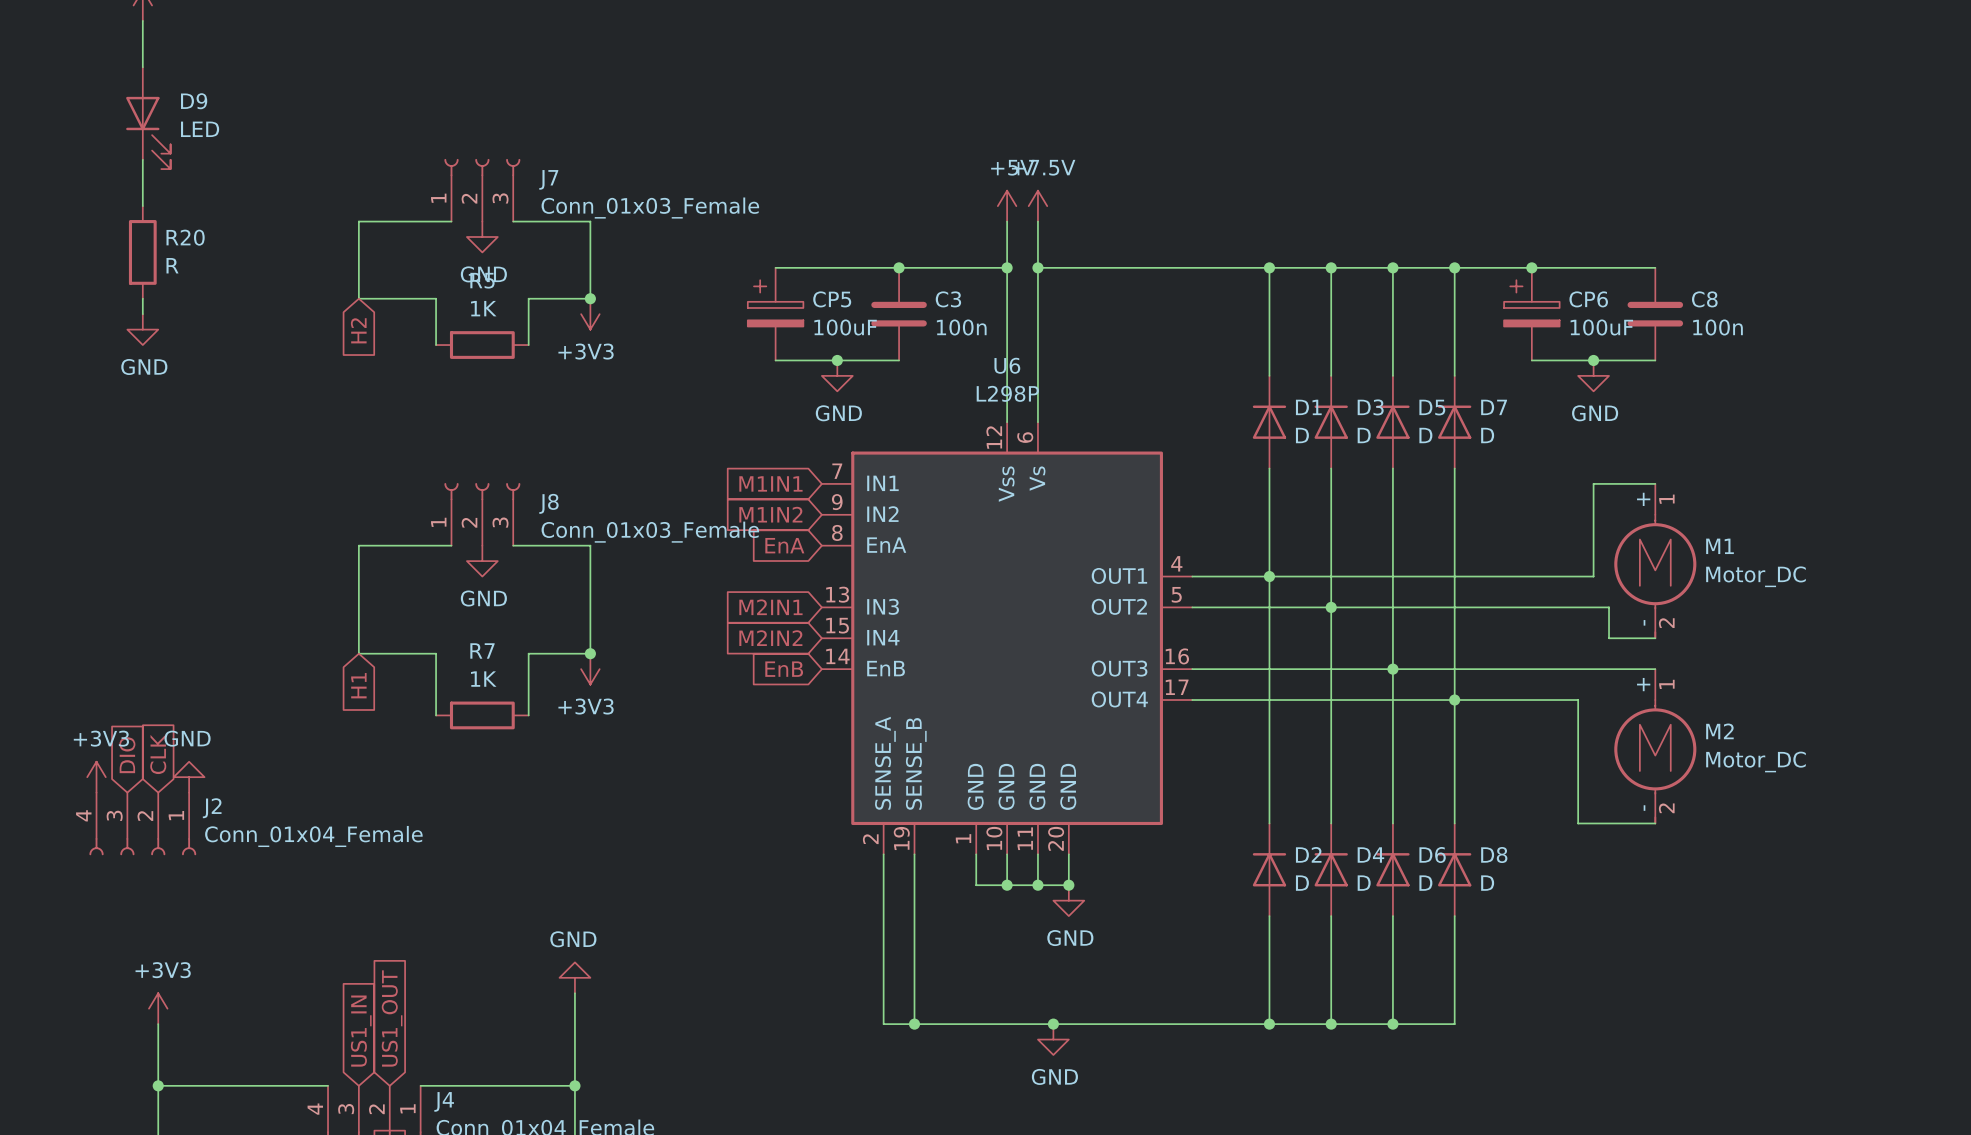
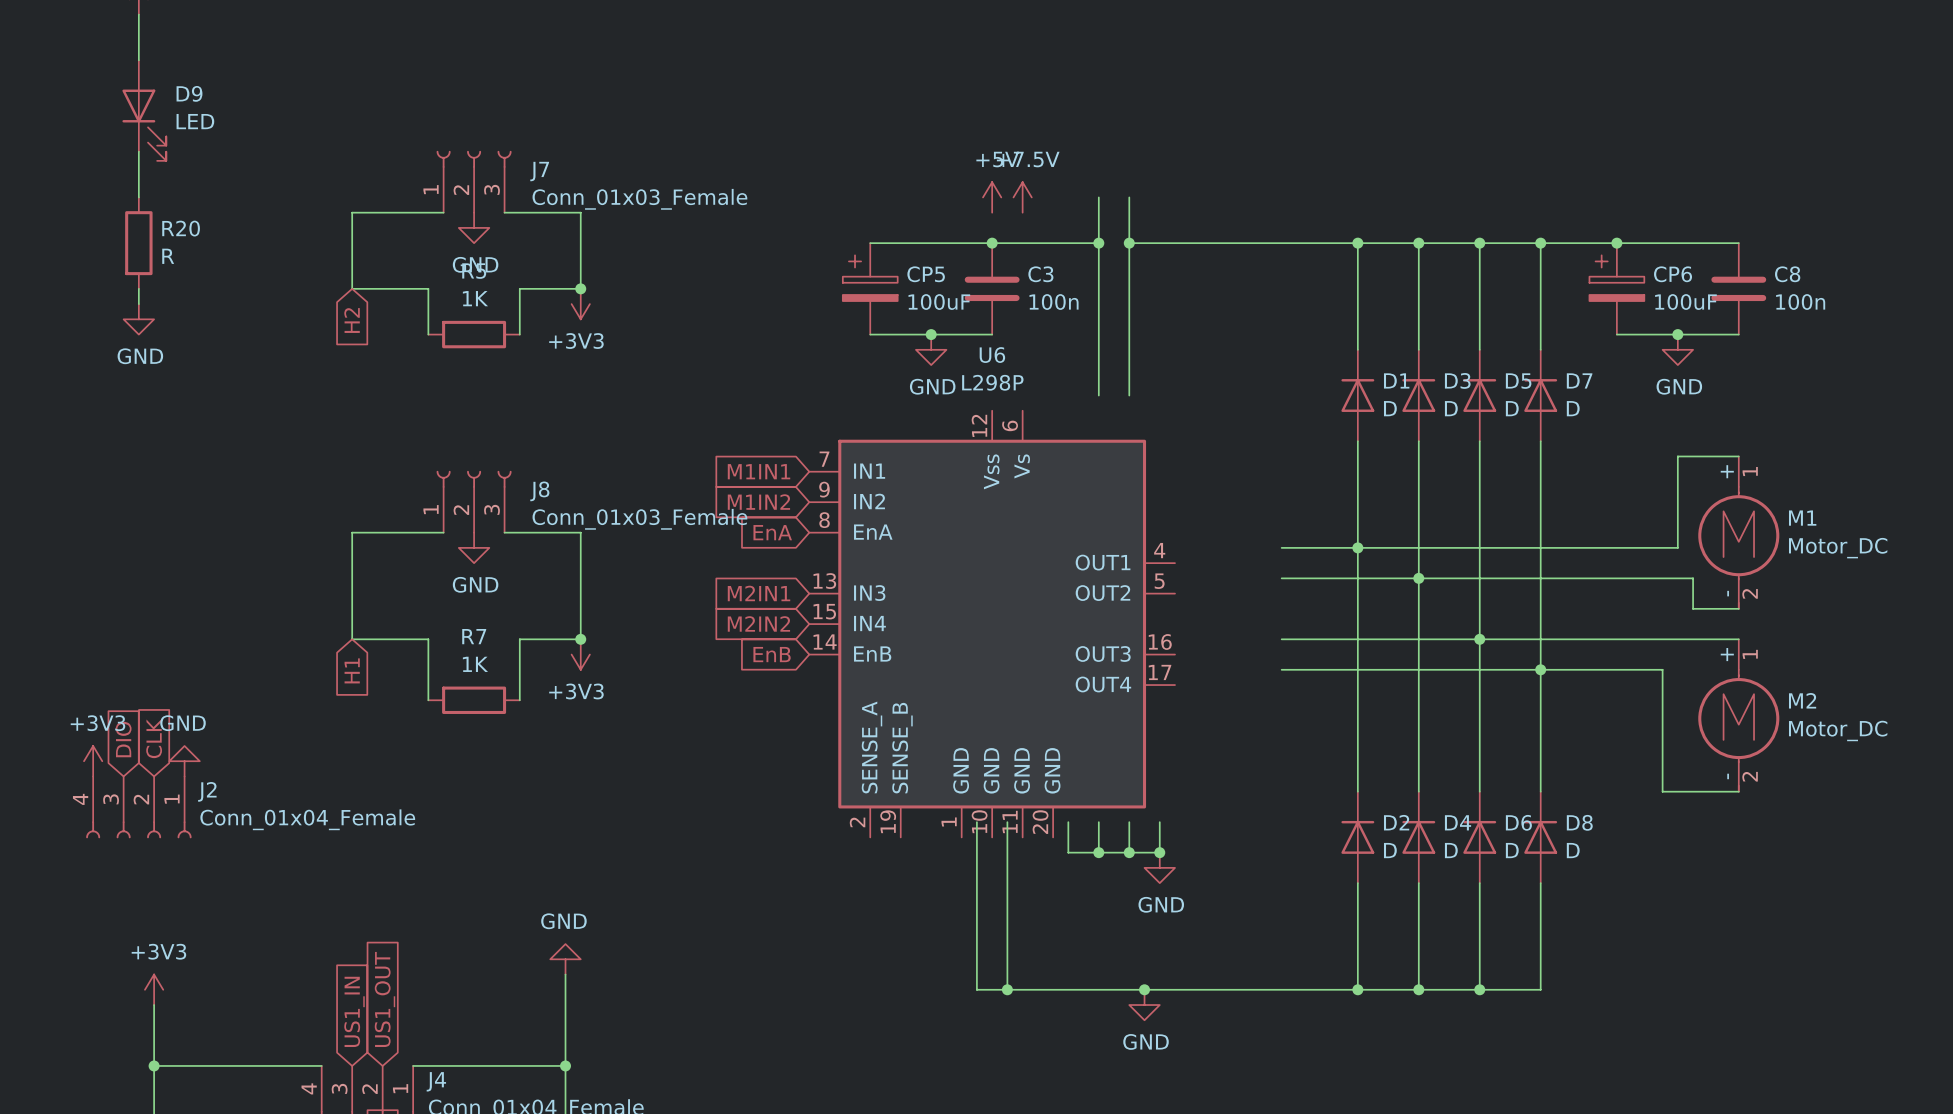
wire: (1007, 221) (1007, 422) -> (1098, 197) (1098, 395)
wire: (1037, 221) (1037, 422) -> (1129, 197) (1129, 395)
junction: none -> (1098, 243)
junction: none -> (1129, 243)
junction: none -> (1479, 243)
junction: none -> (1540, 243)
junction: none -> (1616, 243)
wire: (775, 267) (1007, 267) -> (870, 243) (1098, 243)
junction: (899, 267) -> none
junction position: (1007, 267) -> (992, 243)
wire: (1037, 267) (1655, 267) -> (1129, 243) (1738, 243)
junction: (1037, 267) -> none
wire: (1269, 267) (1269, 375) -> (1357, 243) (1357, 349)
junction: (1269, 267) -> none
wire: (1331, 267) (1331, 375) -> (1418, 243) (1418, 349)
junction: (1331, 267) -> none
wire: (1392, 267) (1392, 375) -> (1479, 243) (1479, 349)
junction position: (1392, 267) -> (1357, 243)
wire: (1454, 267) (1454, 375) -> (1540, 243) (1540, 349)
junction position: (1454, 267) -> (1418, 243)
junction: (1531, 267) -> none
CP5 position: (775, 314) -> (870, 288)
C3 position: (899, 314) -> (992, 288)
CP6 position: (1531, 314) -> (1616, 288)
C8 position: (1655, 314) -> (1738, 288)
junction: none -> (931, 334)
junction: none -> (1677, 334)
wire: (775, 360) (899, 360) -> (870, 334) (992, 334)
junction: (837, 360) -> none
wire: (1531, 360) (1655, 360) -> (1616, 334) (1738, 334)
junction: (1593, 360) -> none
power symbol position: GND (837, 375) -> GND (931, 349)
power symbol position: GND (1593, 375) -> GND (1677, 349)
D1 position: (1269, 422) -> (1357, 395)
D3 position: (1331, 422) -> (1418, 395)
D5 position: (1392, 422) -> (1479, 395)
D7 position: (1454, 422) -> (1540, 395)
wire: (1269, 468) (1269, 823) -> (1357, 441) (1357, 791)
wire: (1331, 468) (1331, 823) -> (1418, 441) (1418, 791)
wire: (1392, 468) (1392, 823) -> (1479, 441) (1479, 791)
wire: (1454, 468) (1454, 823) -> (1540, 441) (1540, 791)
wire: (1655, 483) (1593, 483) (1593, 576) (1192, 576) -> (1738, 456) (1677, 456) (1677, 547) (1281, 547)
junction: none -> (1357, 547)
M1 position: (1655, 561) -> (1738, 532)
junction: (1269, 576) -> none
junction: none -> (1418, 578)
wire: (1192, 607) (1609, 607) (1609, 638) (1655, 638) -> (1281, 578) (1693, 578) (1693, 608) (1738, 608)
junction: (1331, 607) -> none
junction: none -> (1479, 639)
wire: (1192, 669) (1655, 669) -> (1281, 639) (1738, 639)
junction: (1392, 669) -> none
junction: none -> (1540, 669)
wire: (1192, 700) (1578, 700) (1578, 823) (1655, 823) -> (1281, 669) (1662, 669) (1662, 791) (1738, 791)
junction: (1454, 700) -> none
M2 position: (1655, 746) -> (1738, 715)
wire: (883, 854) (883, 1024) (1454, 1024) (1454, 916) -> (976, 822) (976, 989) (1540, 989) (1540, 883)
wire: (914, 854) (914, 1024) -> (1007, 822) (1007, 989)
wire: (976, 854) (976, 885) (1068, 885) (1068, 854) -> (1068, 822) (1068, 852) (1159, 852) (1159, 822)
wire: (1007, 854) (1007, 885) -> (1098, 822) (1098, 852)
wire: (1037, 854) (1037, 885) -> (1129, 822) (1129, 852)
junction: none -> (1098, 852)
junction: none -> (1129, 852)
junction: none -> (1159, 852)
D2 position: (1269, 869) -> (1357, 837)
D4 position: (1331, 869) -> (1418, 837)
D6 position: (1392, 869) -> (1479, 837)
D8 position: (1454, 869) -> (1540, 837)
junction: (1007, 885) -> none
junction: (1037, 885) -> none
junction: (1068, 885) -> none
power symbol: none -> GND (1159, 867)
power symbol: GND (1068, 900) -> none
wire: (1269, 916) (1269, 1024) -> (1357, 883) (1357, 989)
wire: (1331, 916) (1331, 1024) -> (1418, 883) (1418, 989)
wire: (1392, 916) (1392, 1024) -> (1479, 883) (1479, 989)
junction: none -> (1144, 989)
junction: none -> (1418, 989)
junction: none -> (1479, 989)
junction: (914, 1024) -> none
junction position: (1053, 1024) -> (1007, 989)
power symbol: none -> GND (1144, 1005)
junction: (1269, 1024) -> none
junction: (1331, 1024) -> none
junction position: (1392, 1024) -> (1357, 989)
power symbol: GND (1053, 1039) -> none

